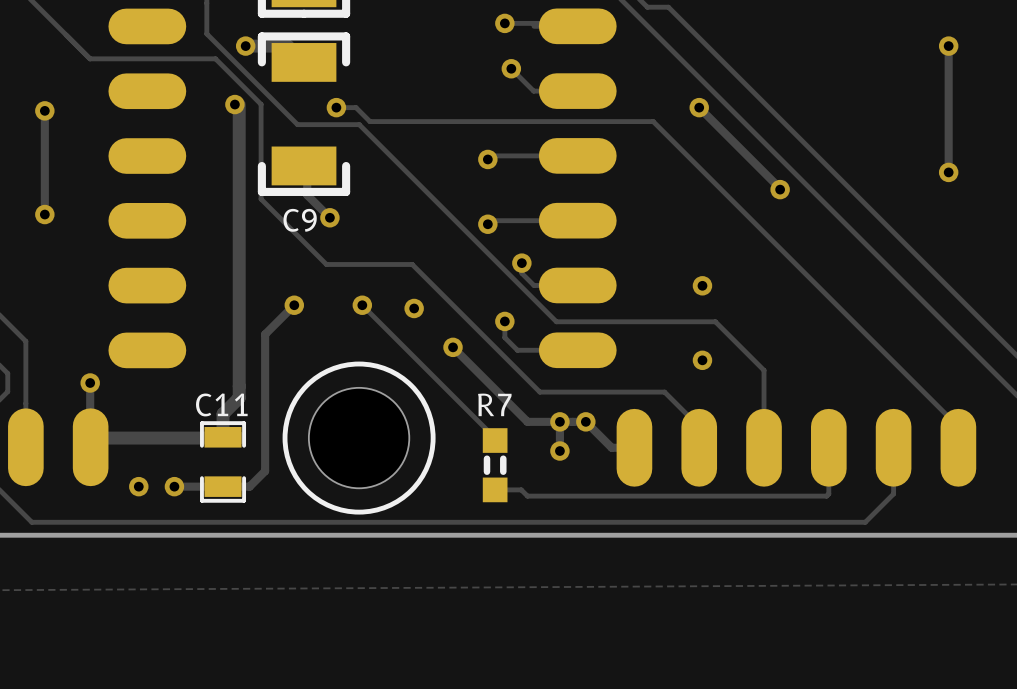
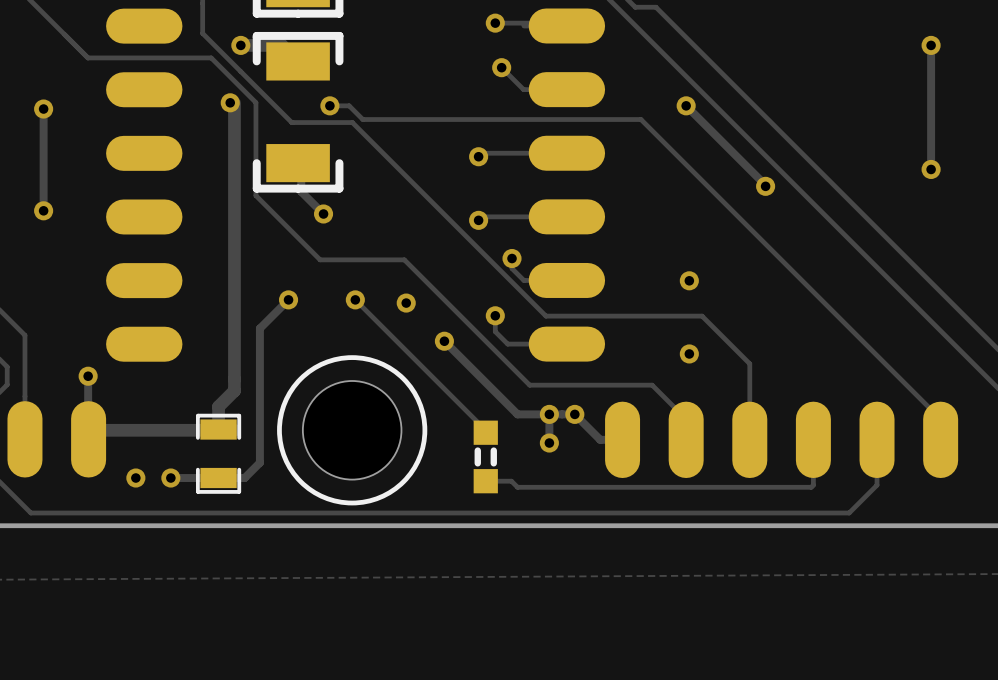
C9 name: C9 (300, 220) -> none
C11 name: C11 (221, 404) -> none
R7 name: R7 (494, 404) -> none

